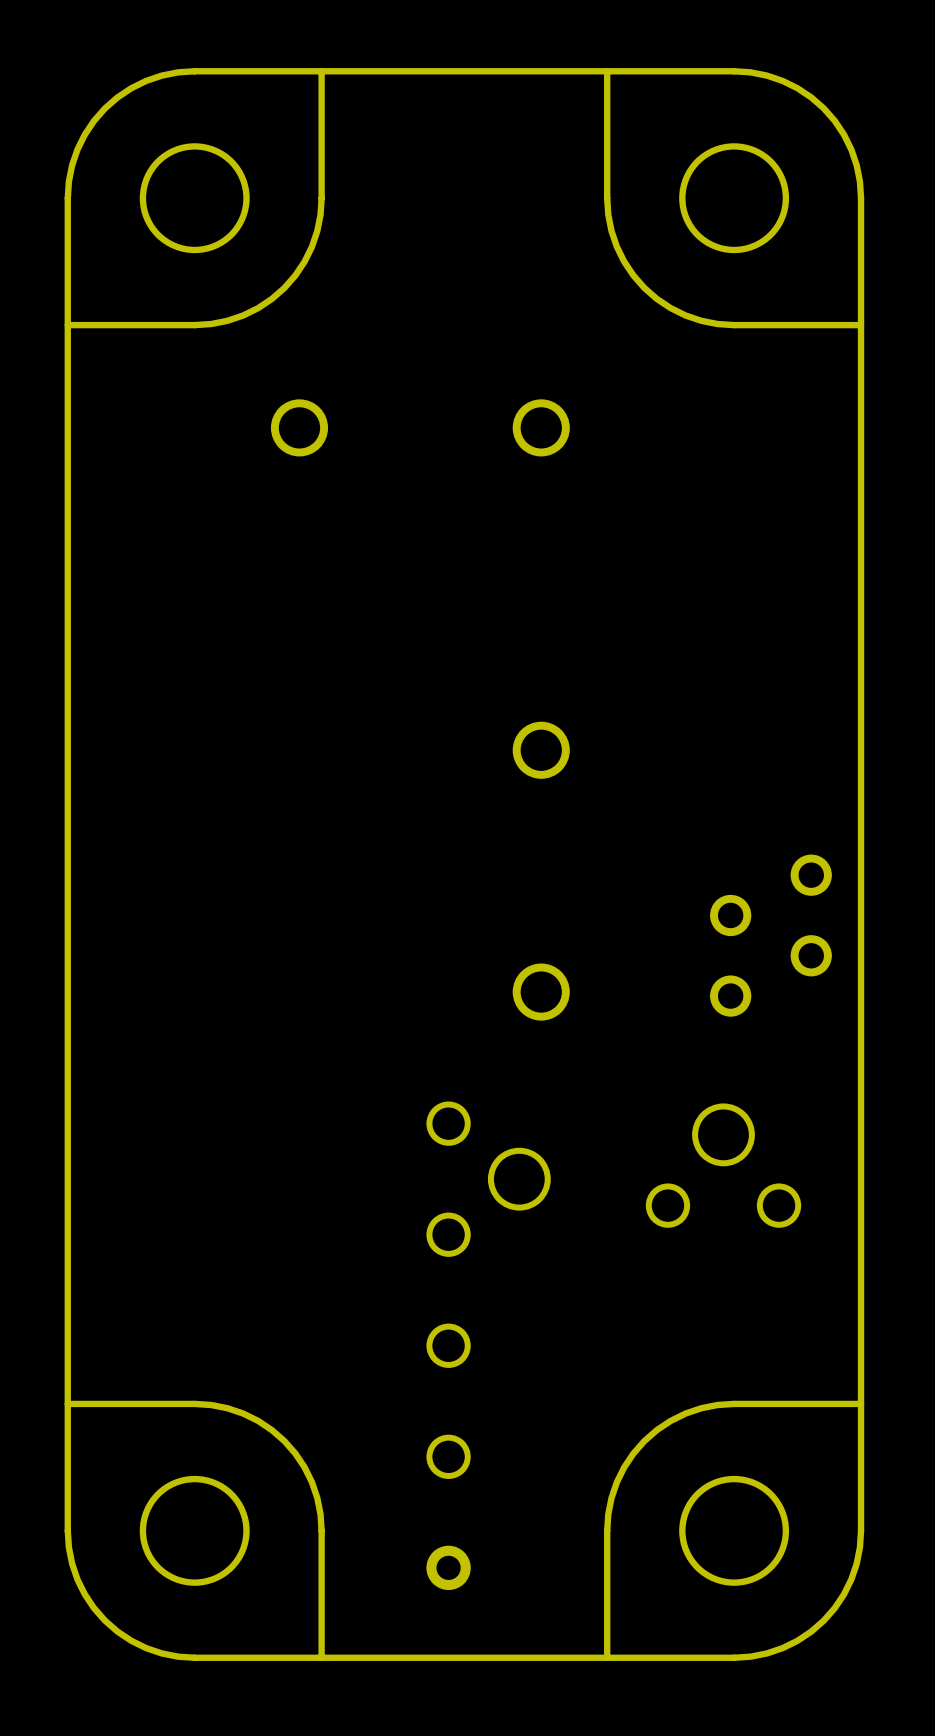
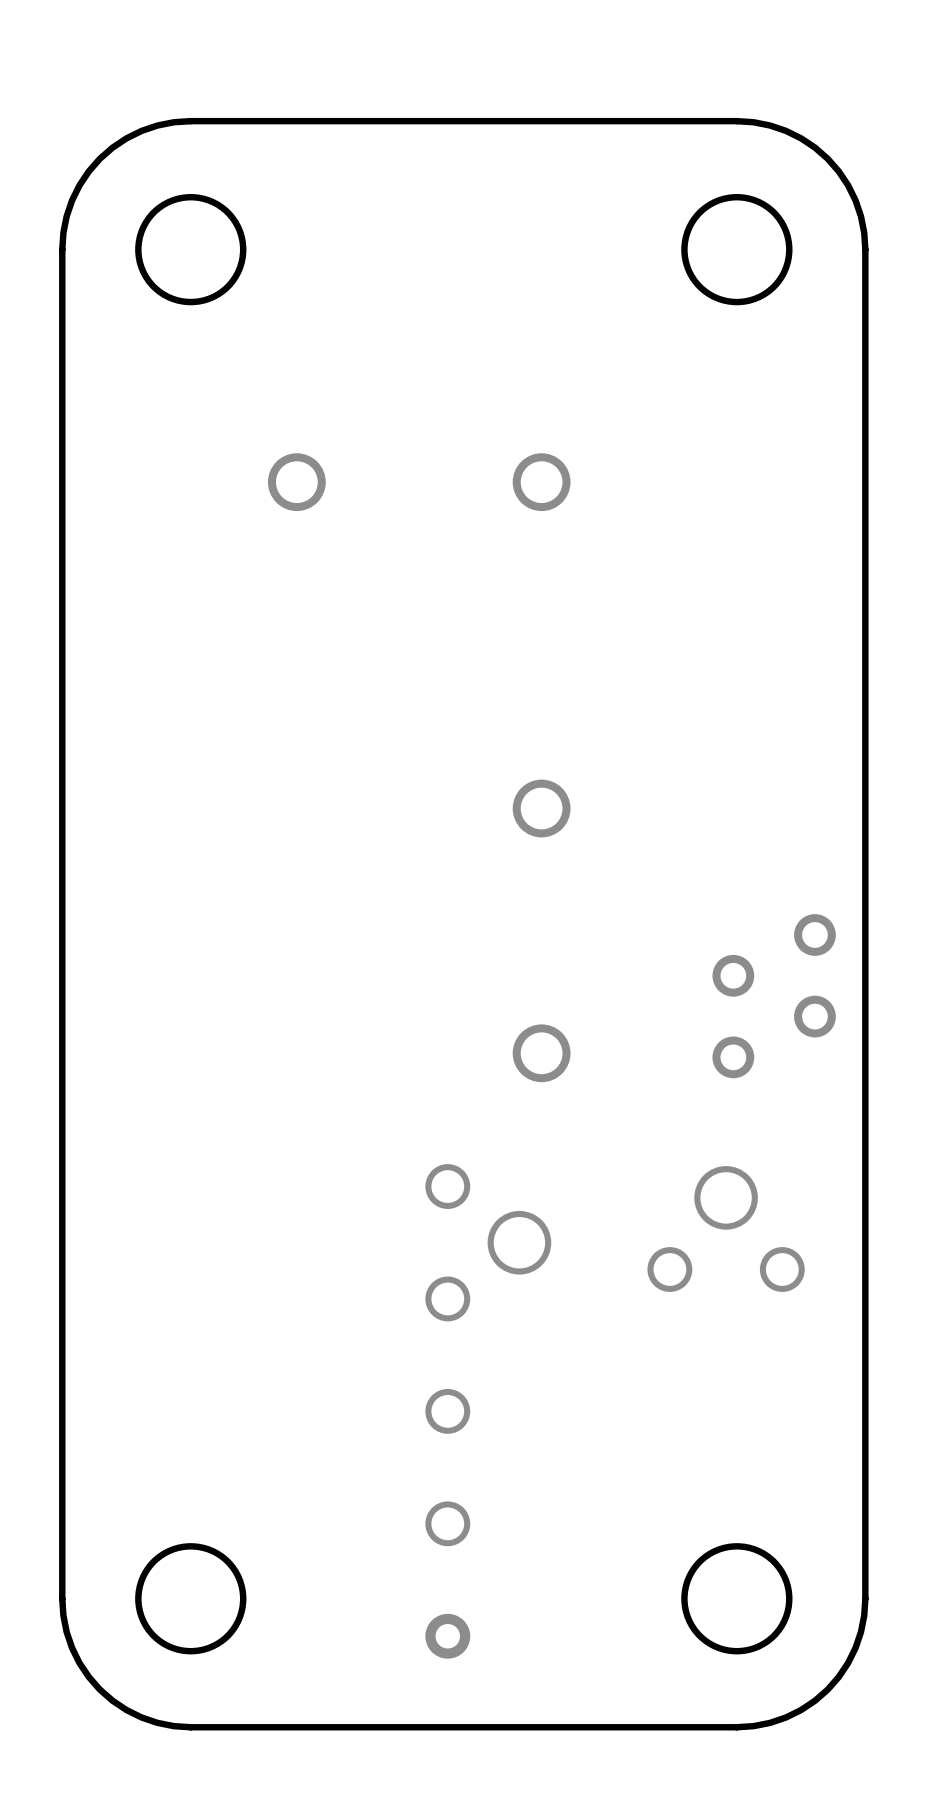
board edge: (321, 71) (320, 214) (311, 246) (295, 275) (284, 287) (271, 298) (243, 315) (211, 324) (67, 325) -> none
board edge: (607, 71) (608, 214) (616, 246) (633, 275) (644, 287) (656, 298) (685, 315) (717, 324) (861, 325) -> none
board edge: (67, 1403) (211, 1405) (243, 1413) (271, 1430) (284, 1441) (295, 1453) (311, 1482) (320, 1514) (321, 1657) -> none
board edge: (861, 1403) (717, 1405) (685, 1413) (656, 1430) (644, 1441) (633, 1453) (616, 1482) (608, 1514) (607, 1657) -> none

